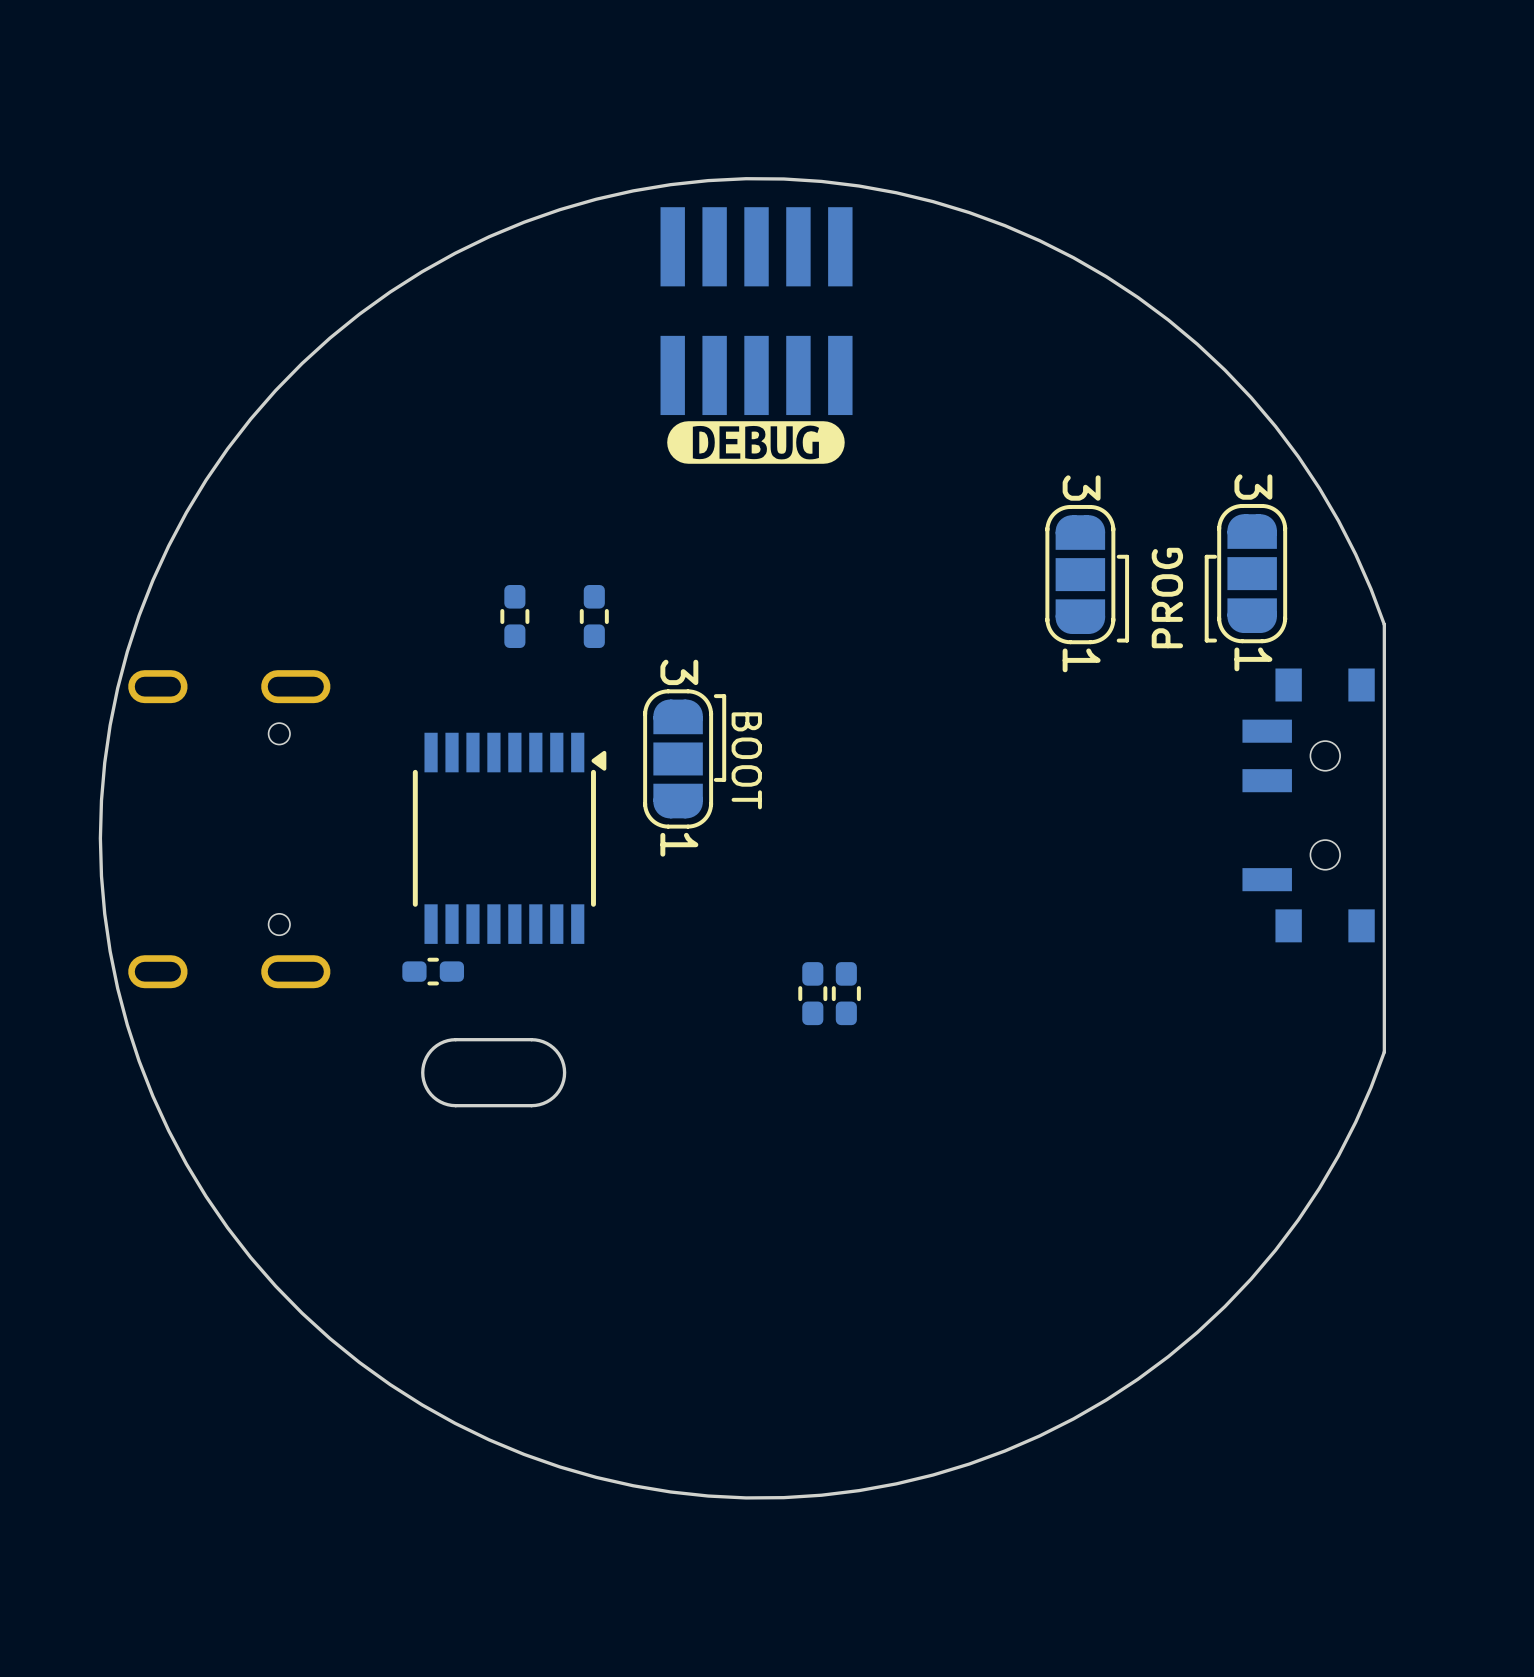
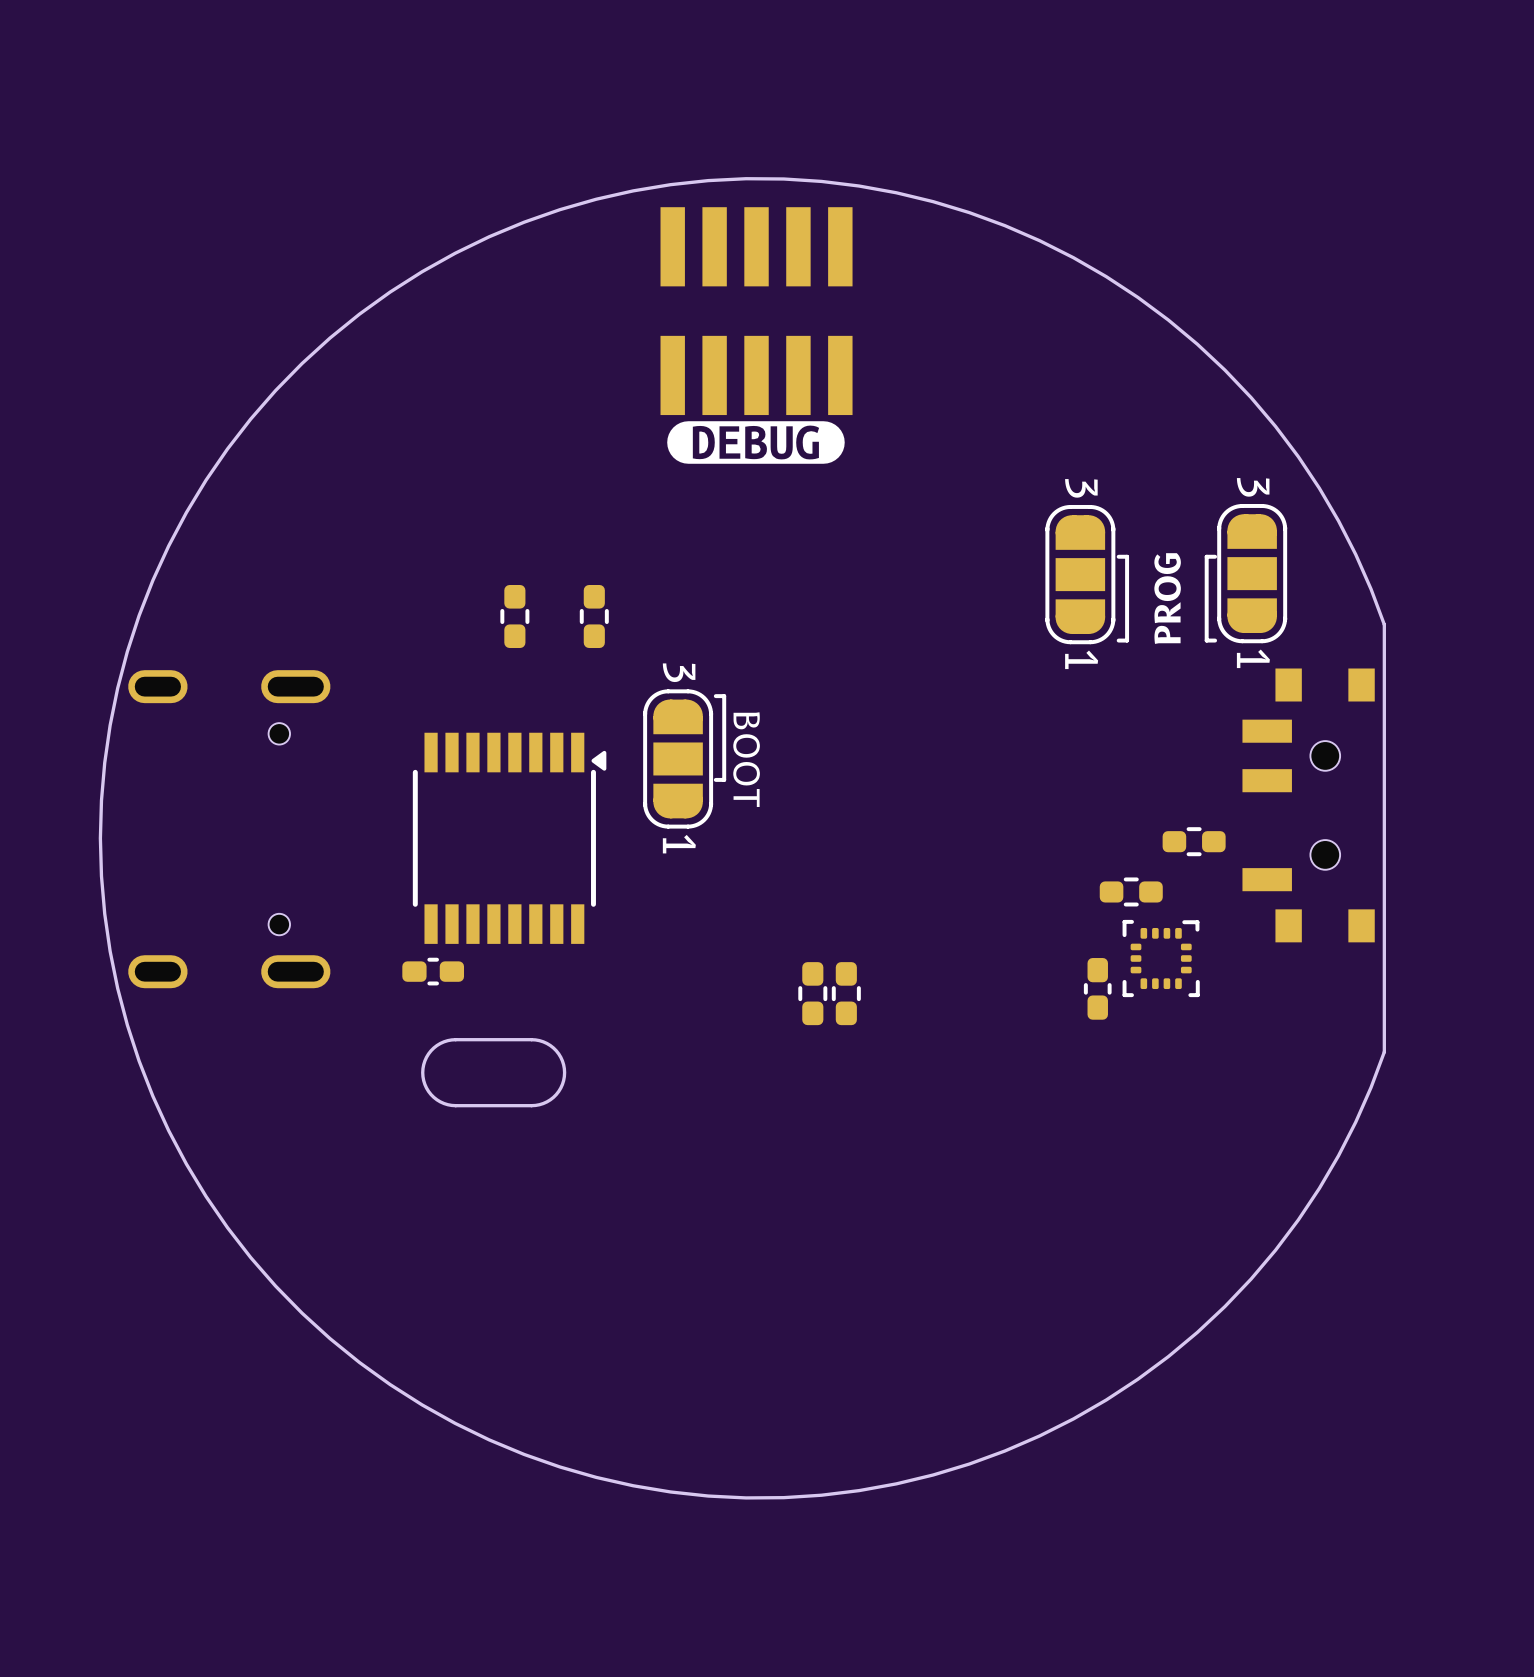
part: none -> (1194, 841)
part: none -> (1131, 891)
part: none -> (1161, 958)
part: none -> (1097, 988)

